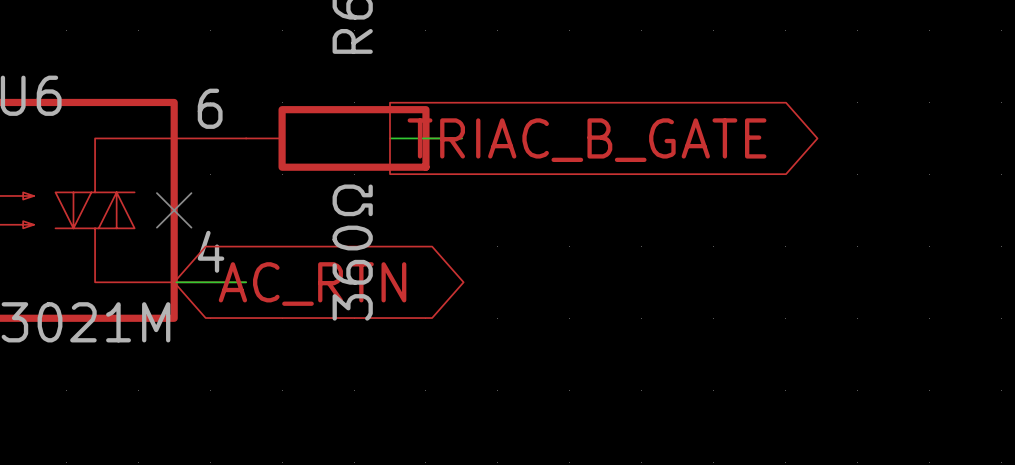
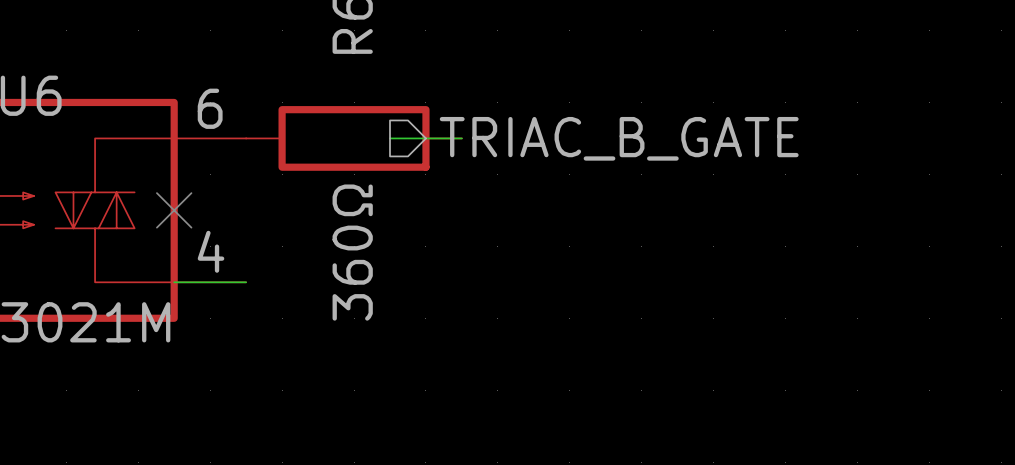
hierarchical label: none -> TRIAC_B_GATE (619, 138)
global label: TRIAC_B_GATE (587, 140) -> none
global label: AC_RTN (312, 284) -> none

